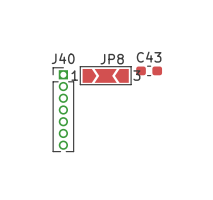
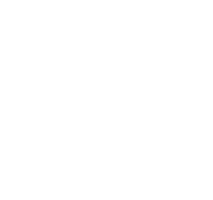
C43: (149, 70) -> none
JP8: (105, 75) -> none
J40: (63, 109) -> none

